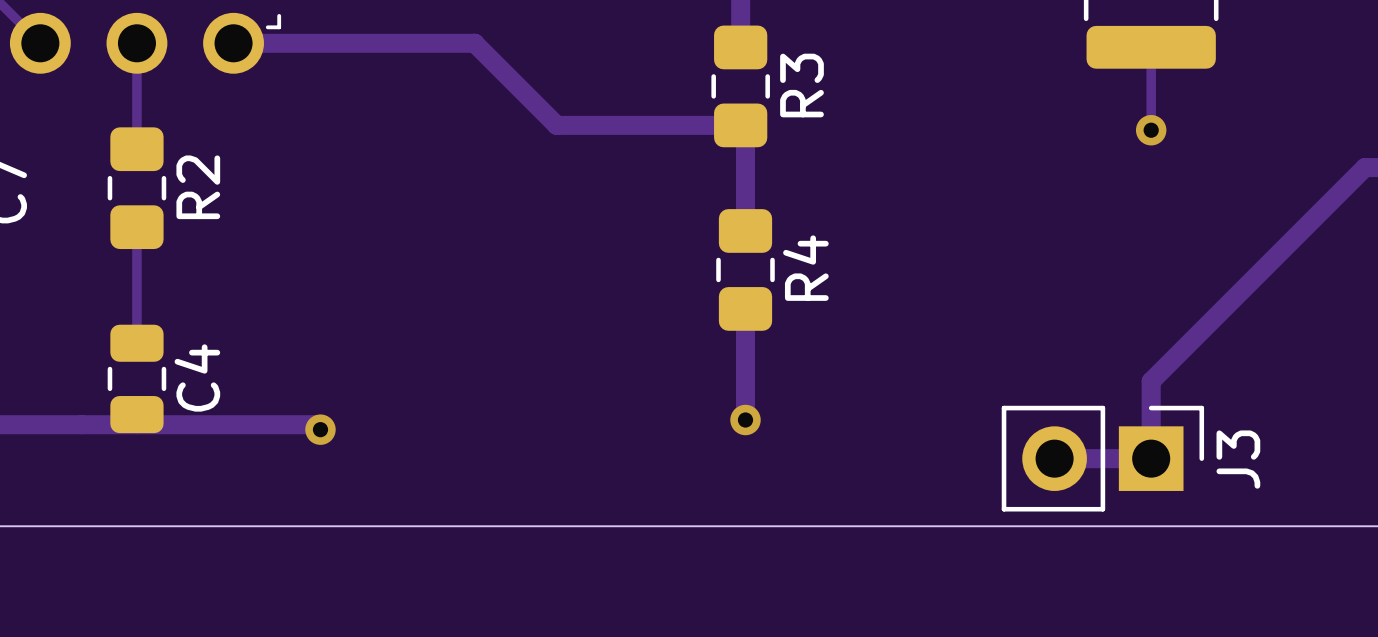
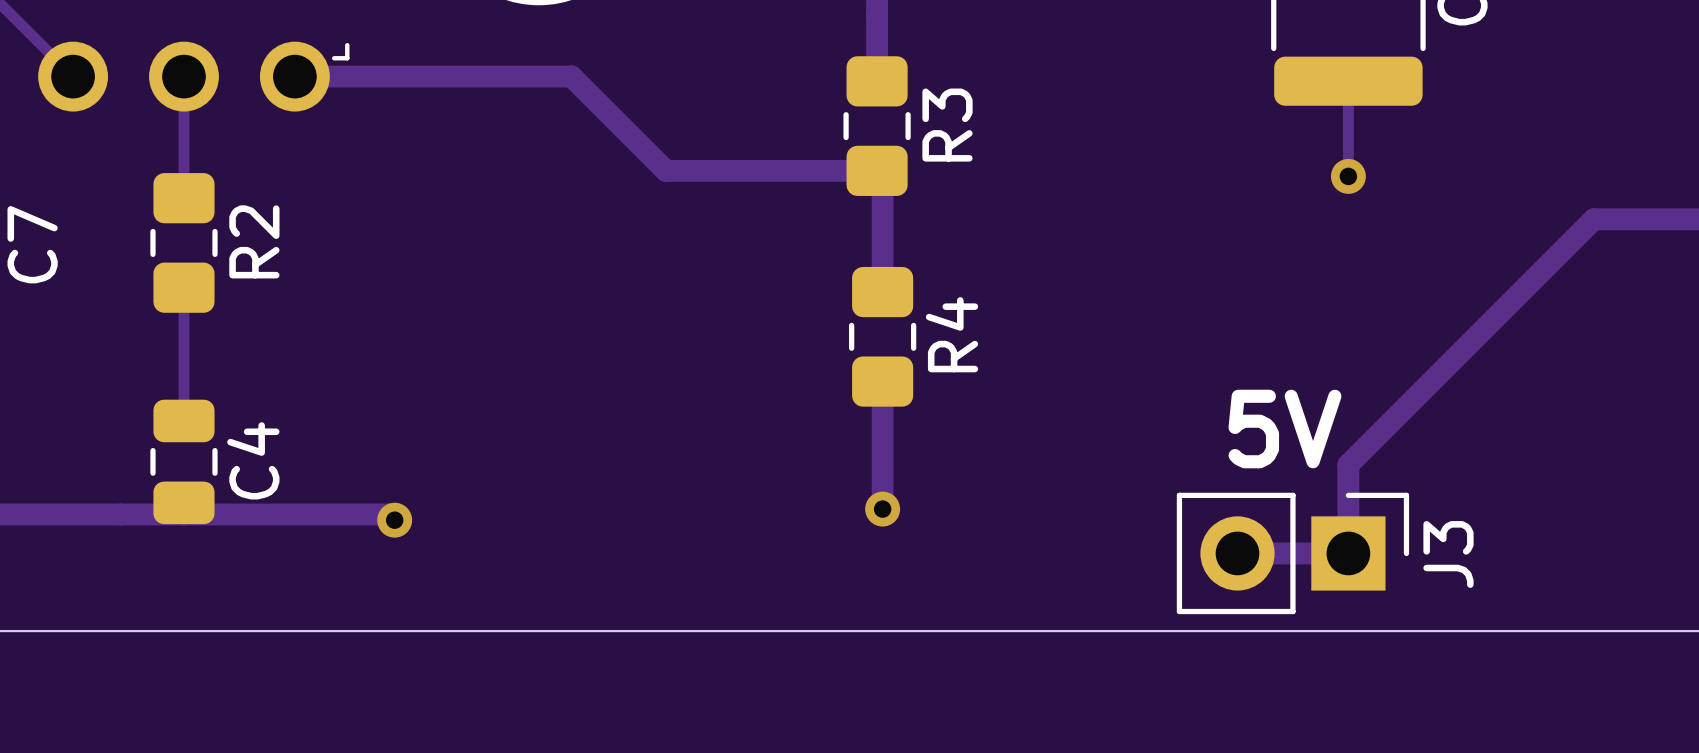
text: none -> 5V (1284, 429)

